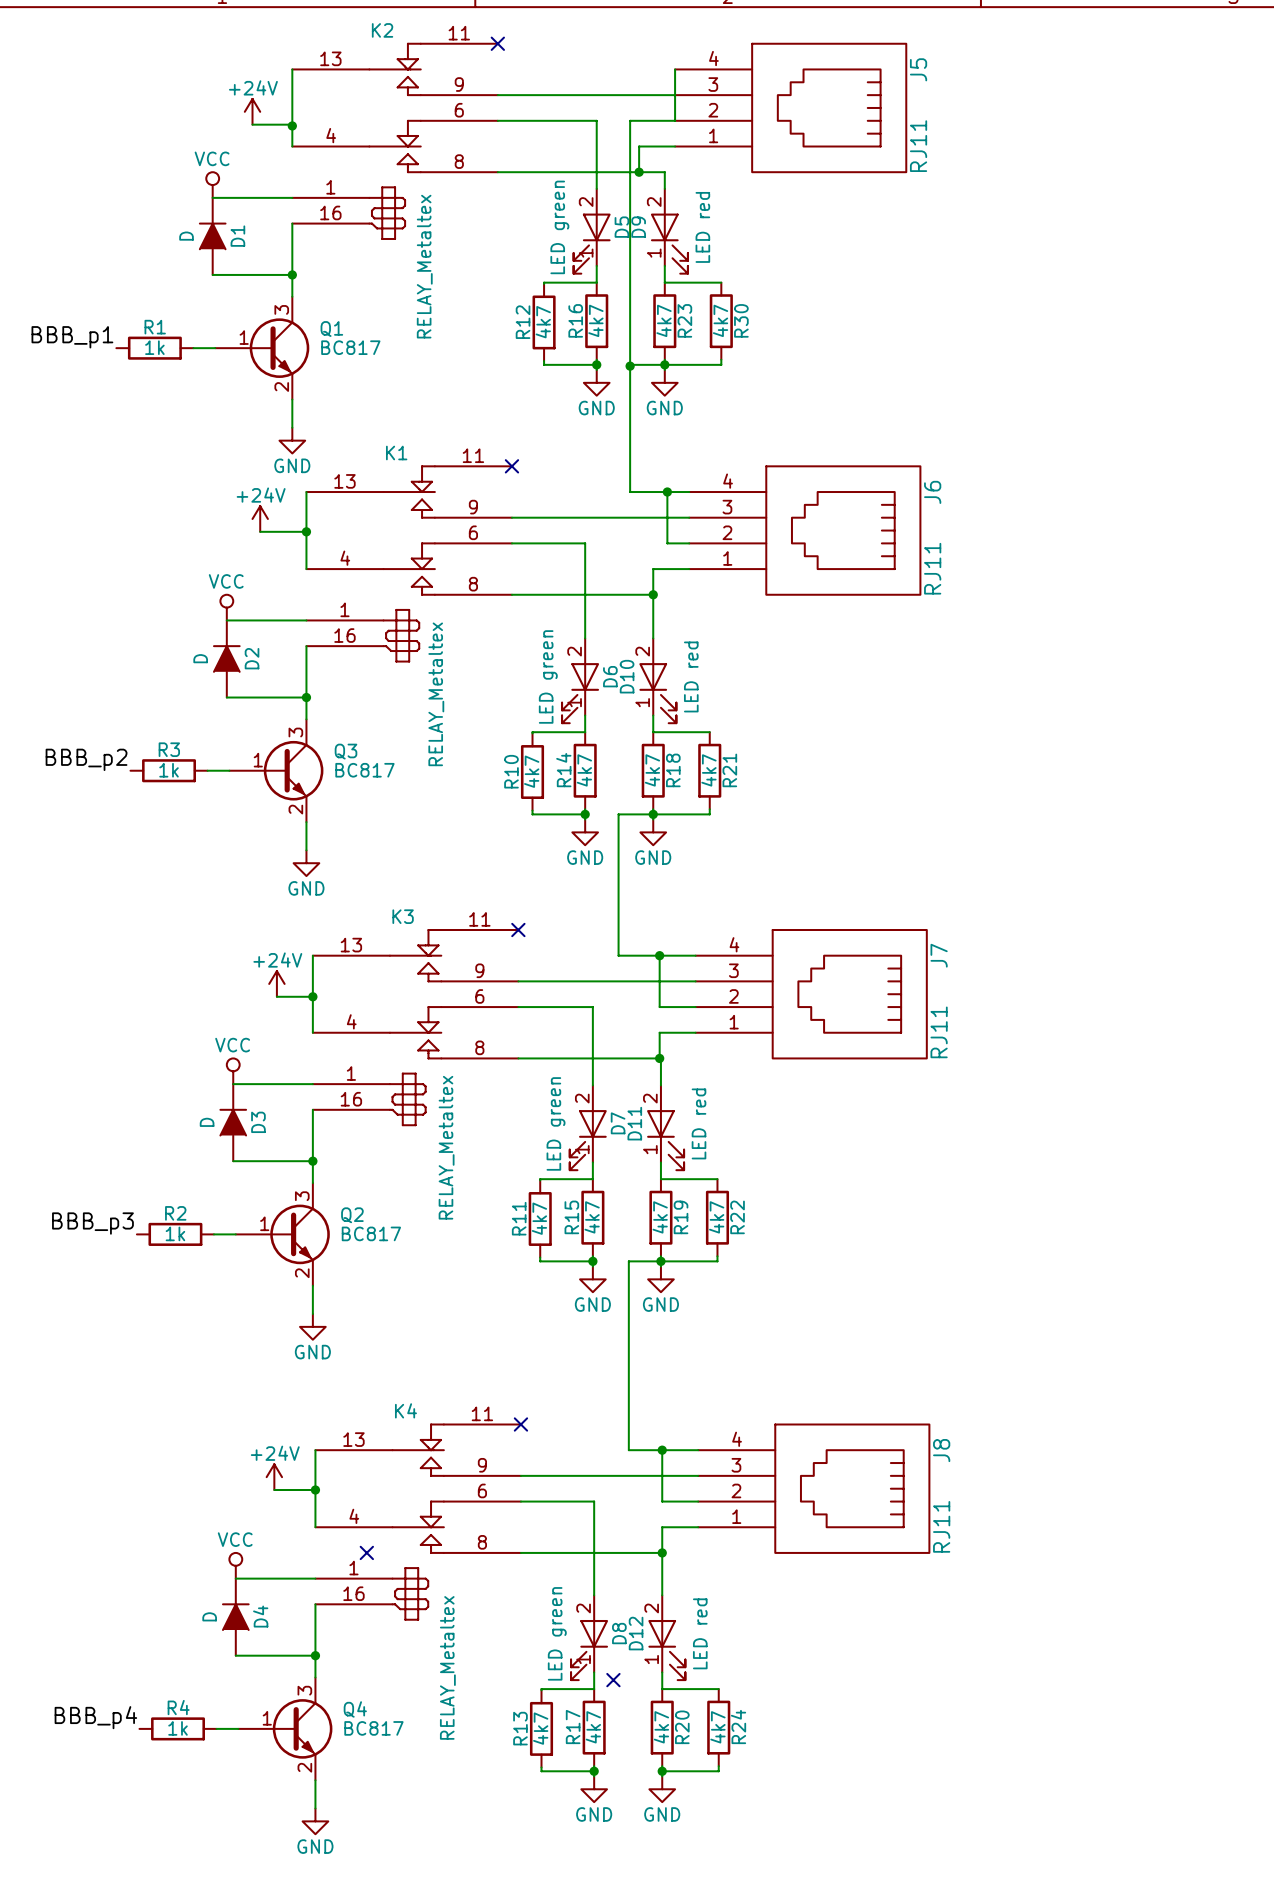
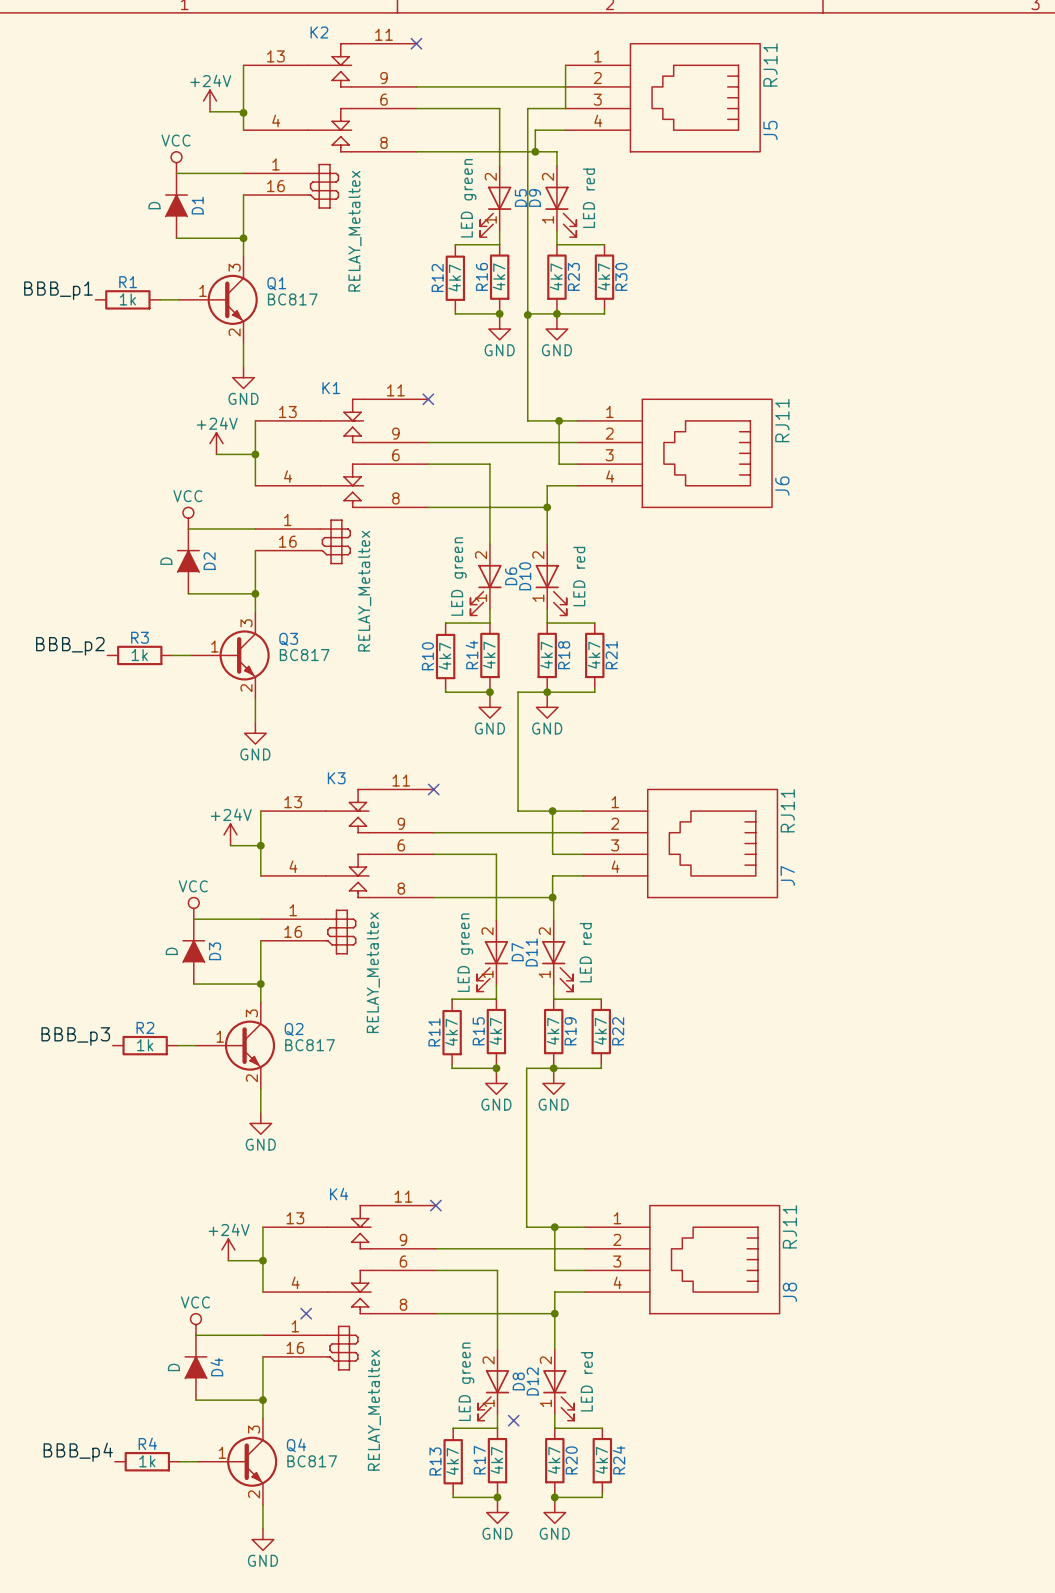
J5 flip: as is (829, 107) -> up-down (695, 97)
J6 flip: as is (843, 530) -> up-down (707, 453)
J7 flip: as is (849, 994) -> up-down (712, 843)
J8 flip: as is (852, 1488) -> up-down (714, 1259)

